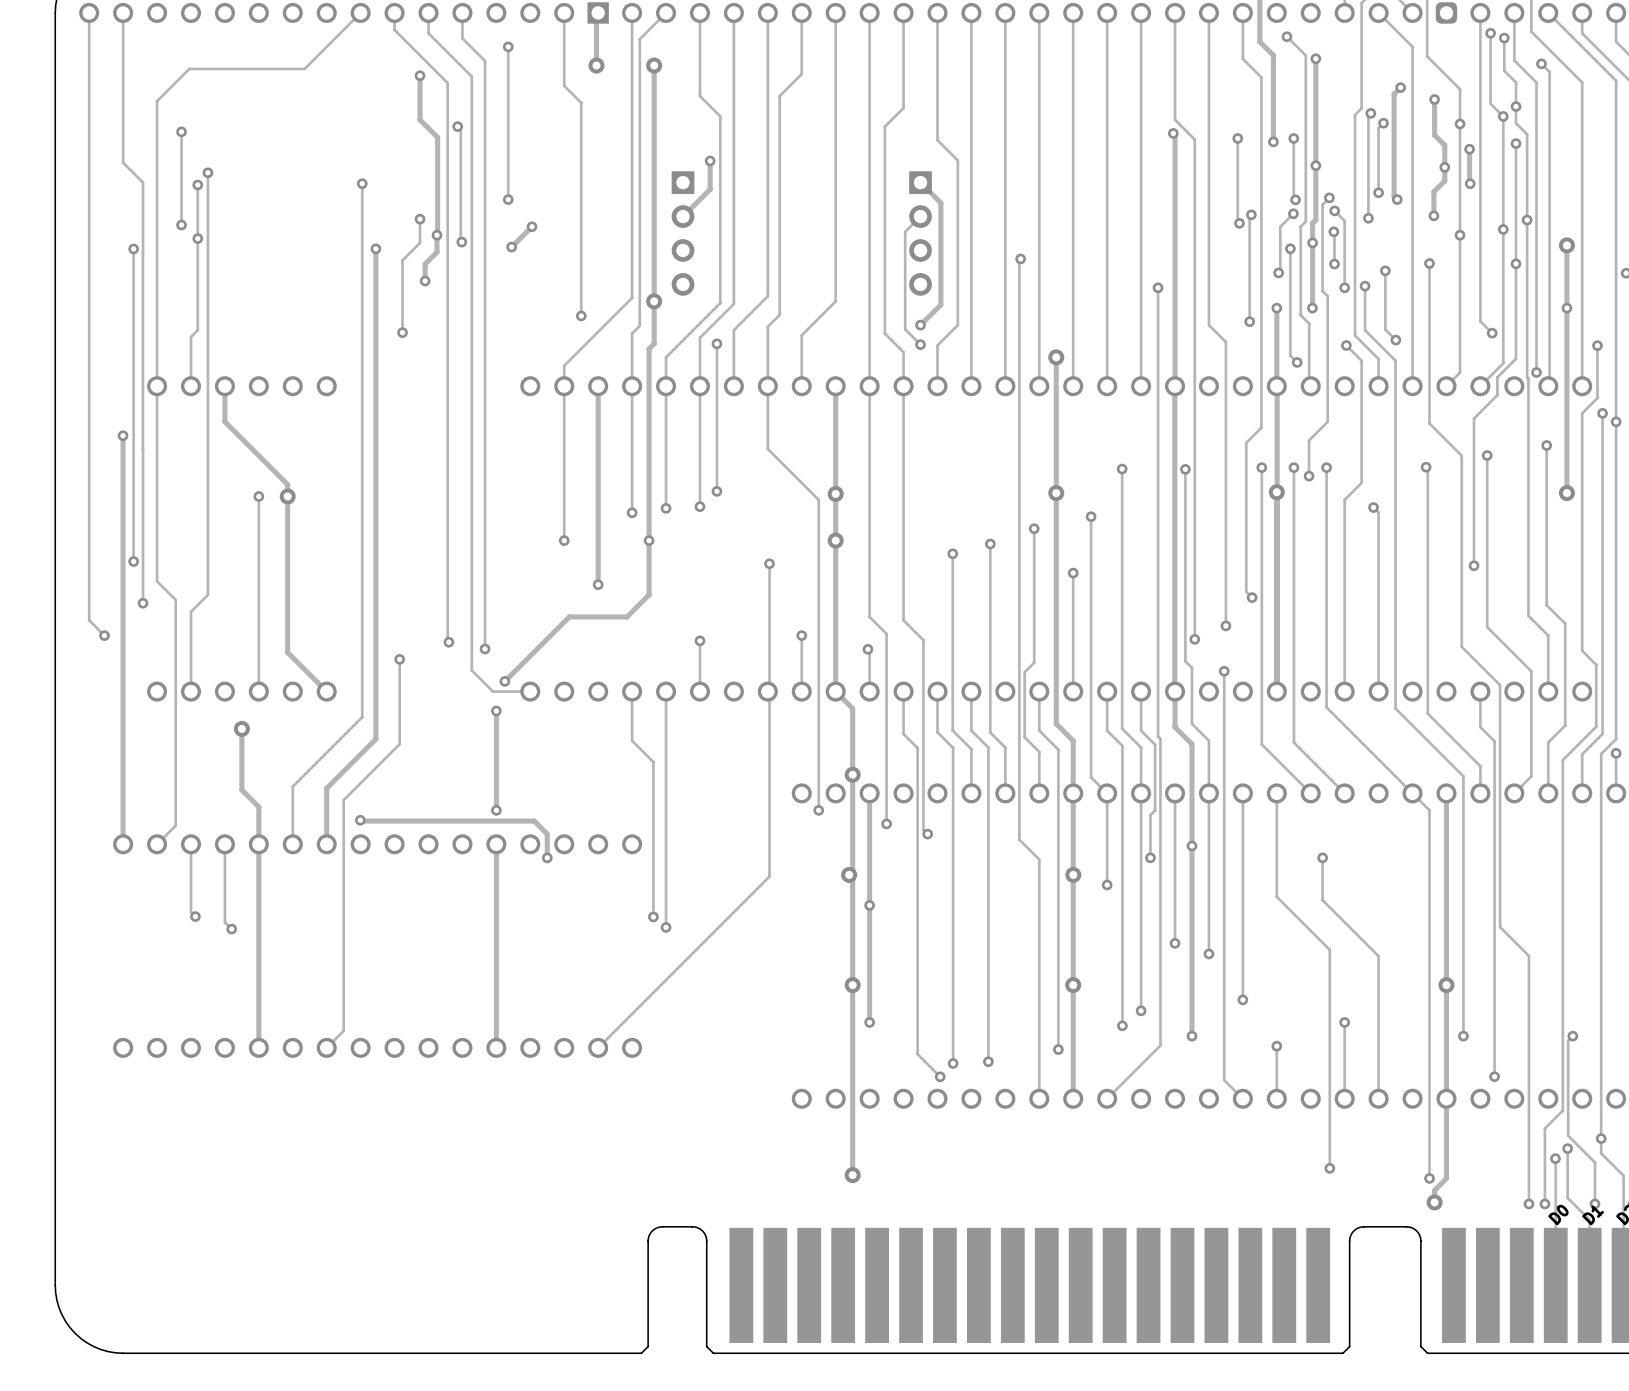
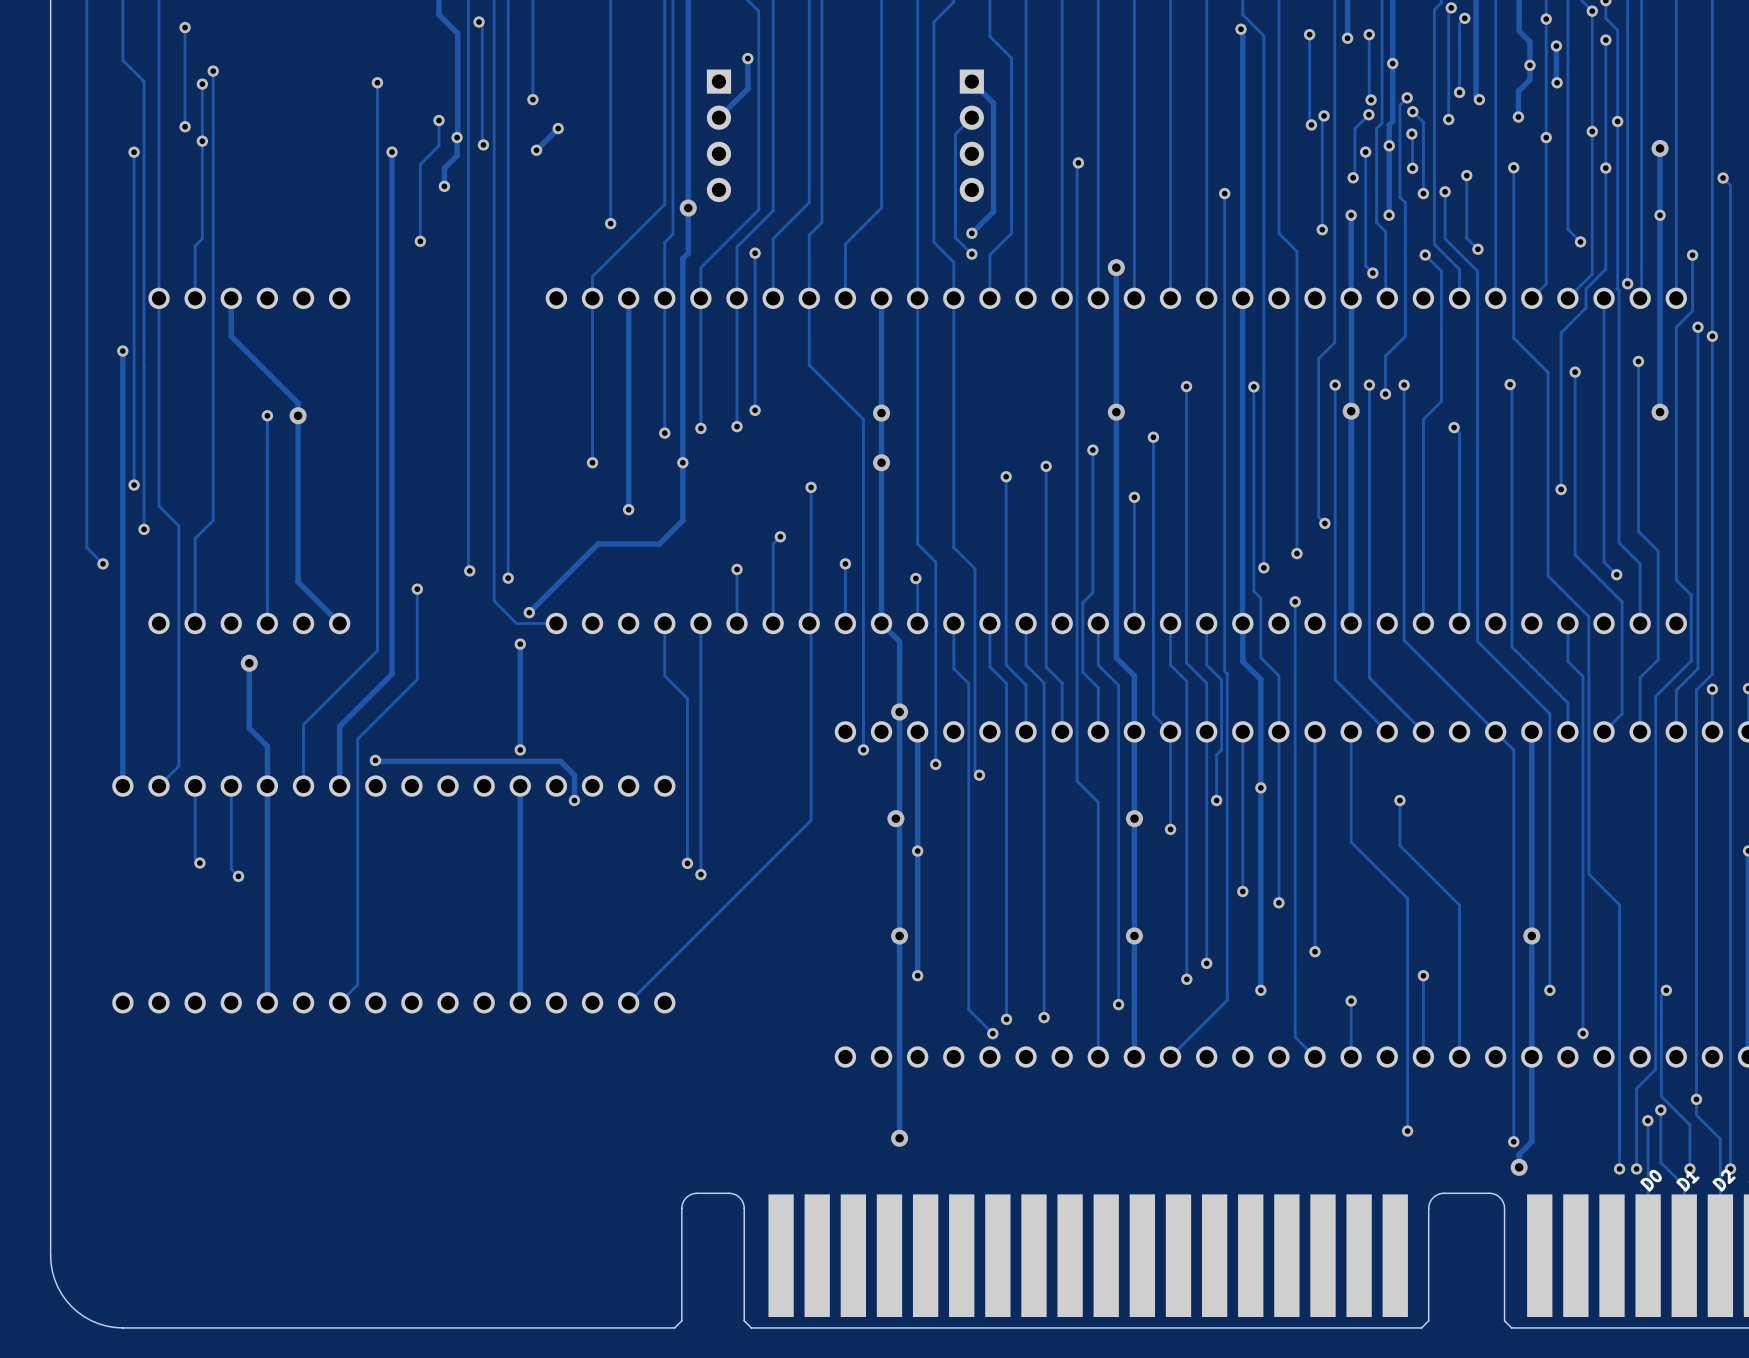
track: none -> (1604, 298) (1604, 562) (1616, 574)
track: none -> (780, 536) (773, 544) (773, 623)
via: none -> (780, 536)
via: none -> (1616, 574)

